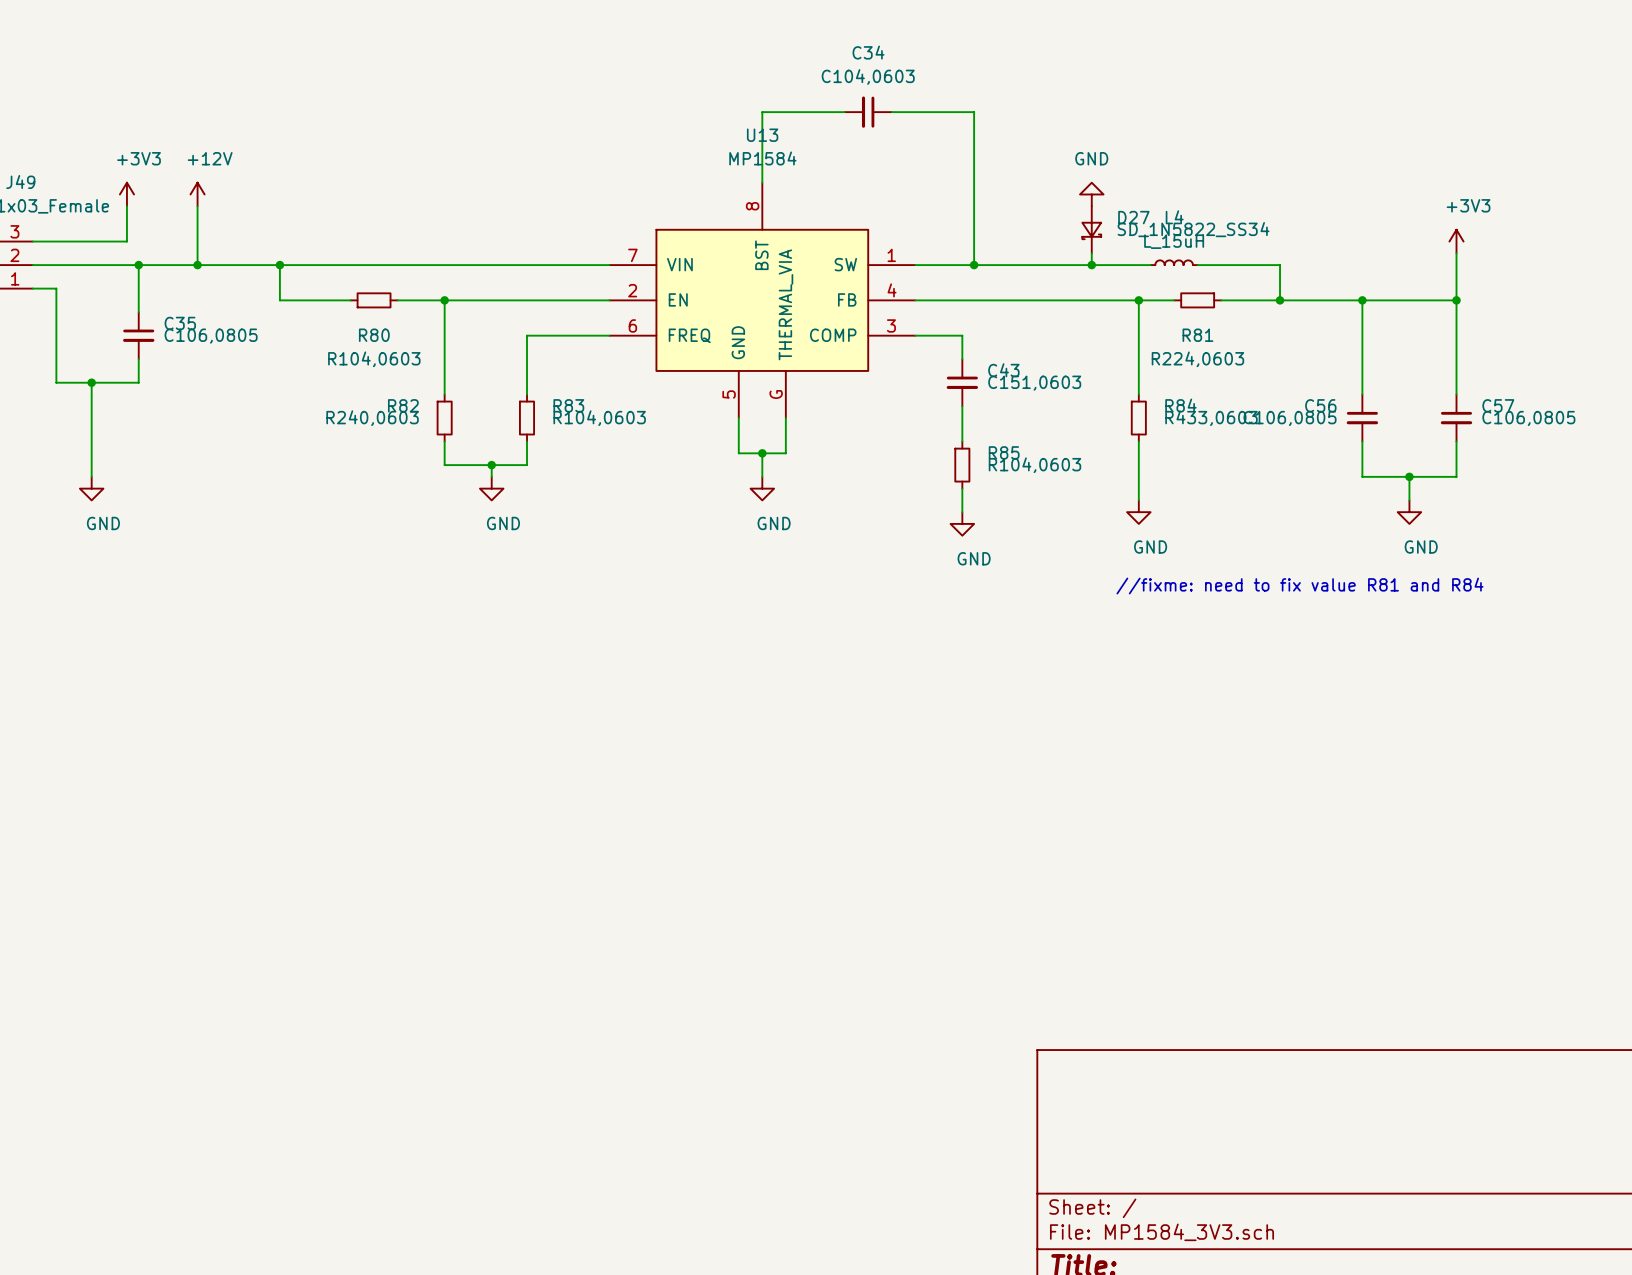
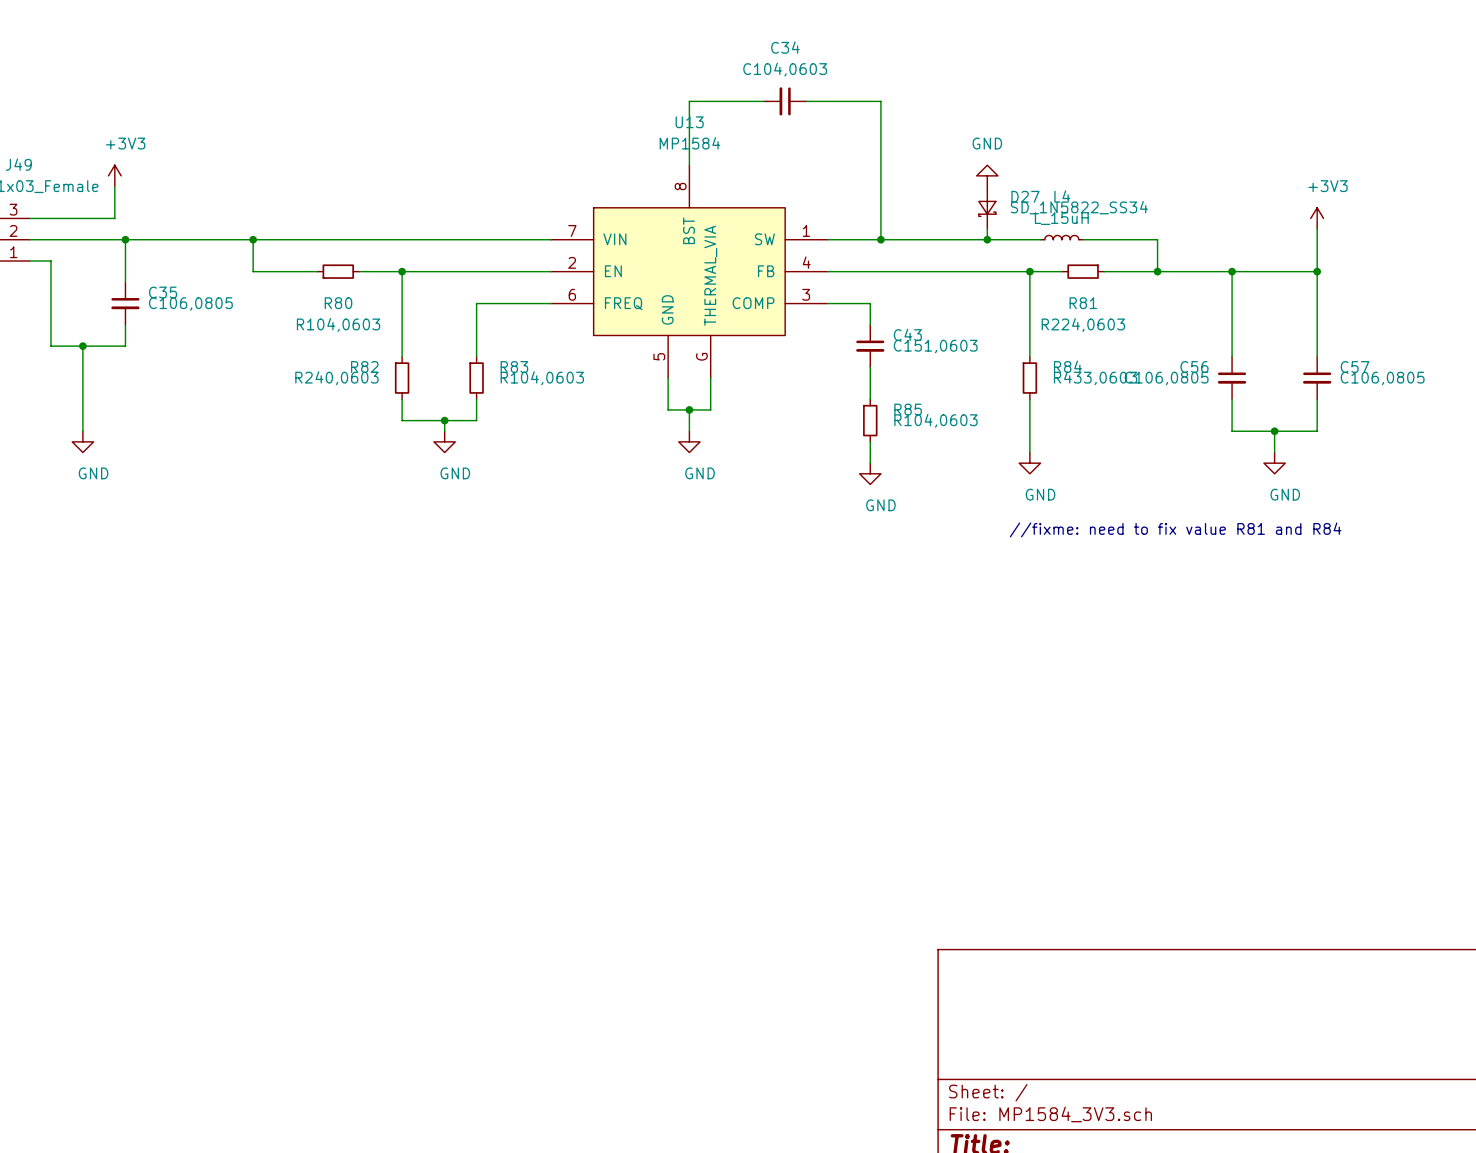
power symbol: +12V (197, 194) -> none
wire: (197, 206) (197, 265) -> none
junction: (197, 265) -> none

